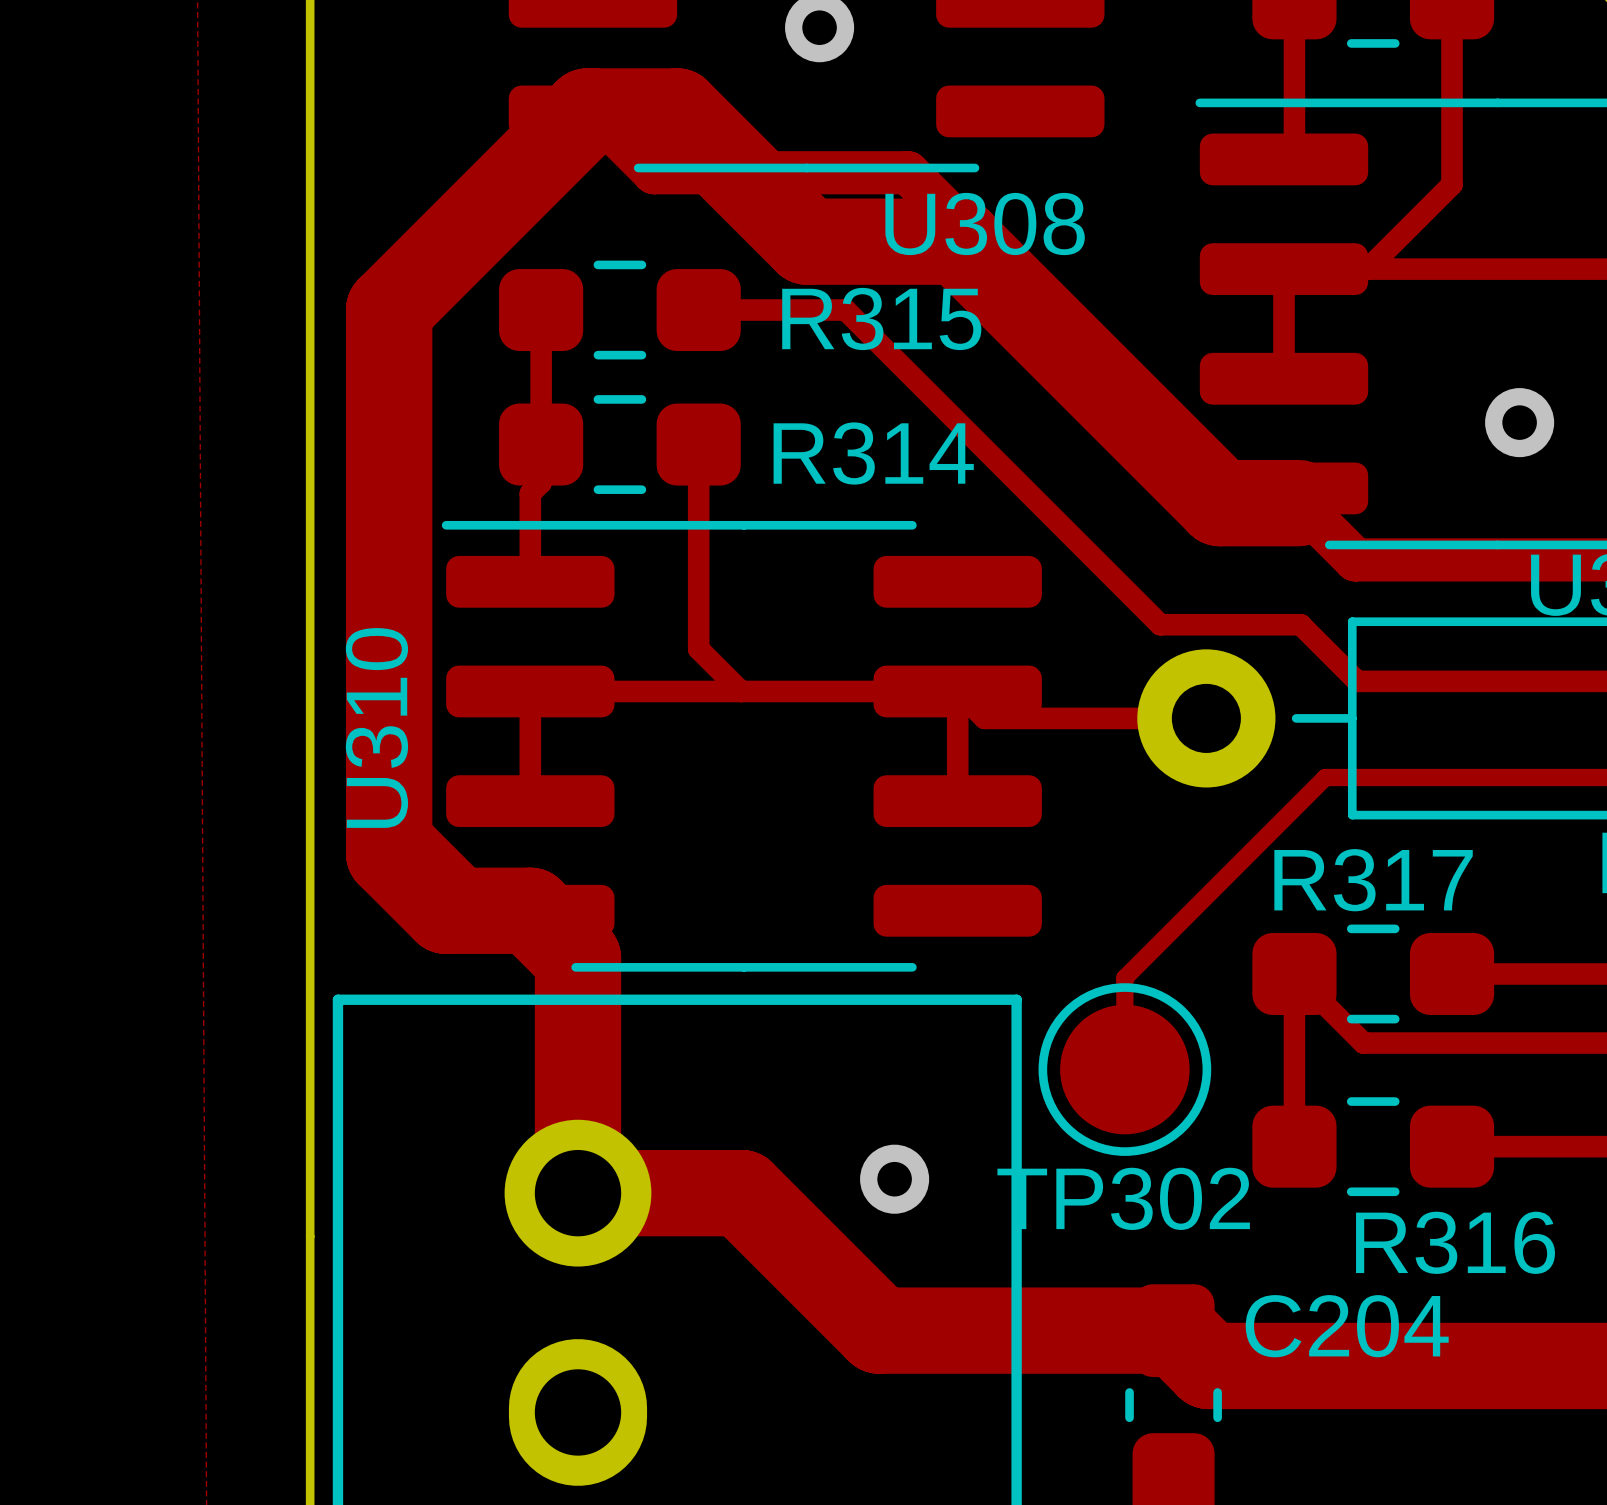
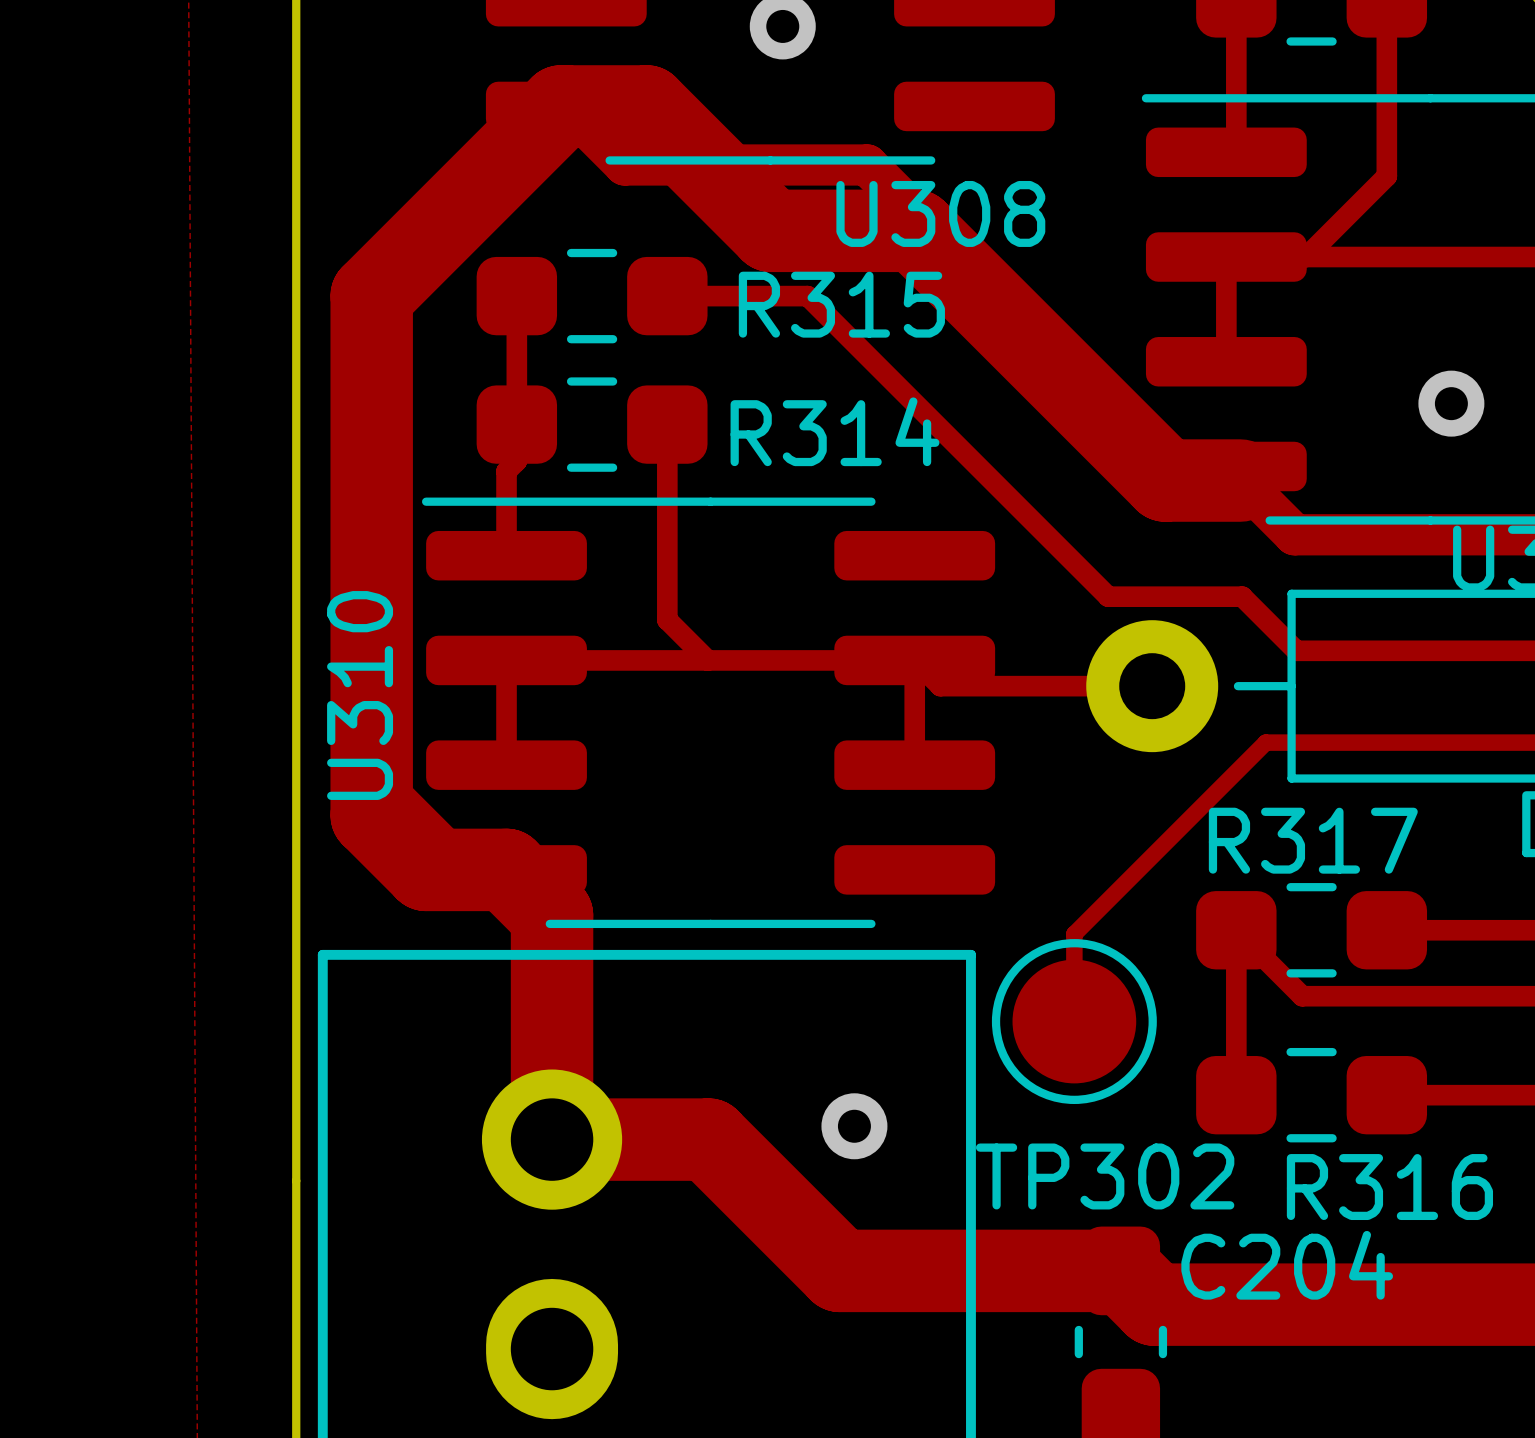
TP302 name position: TP302 (1123, 1198) -> TP302 (1105, 1176)

